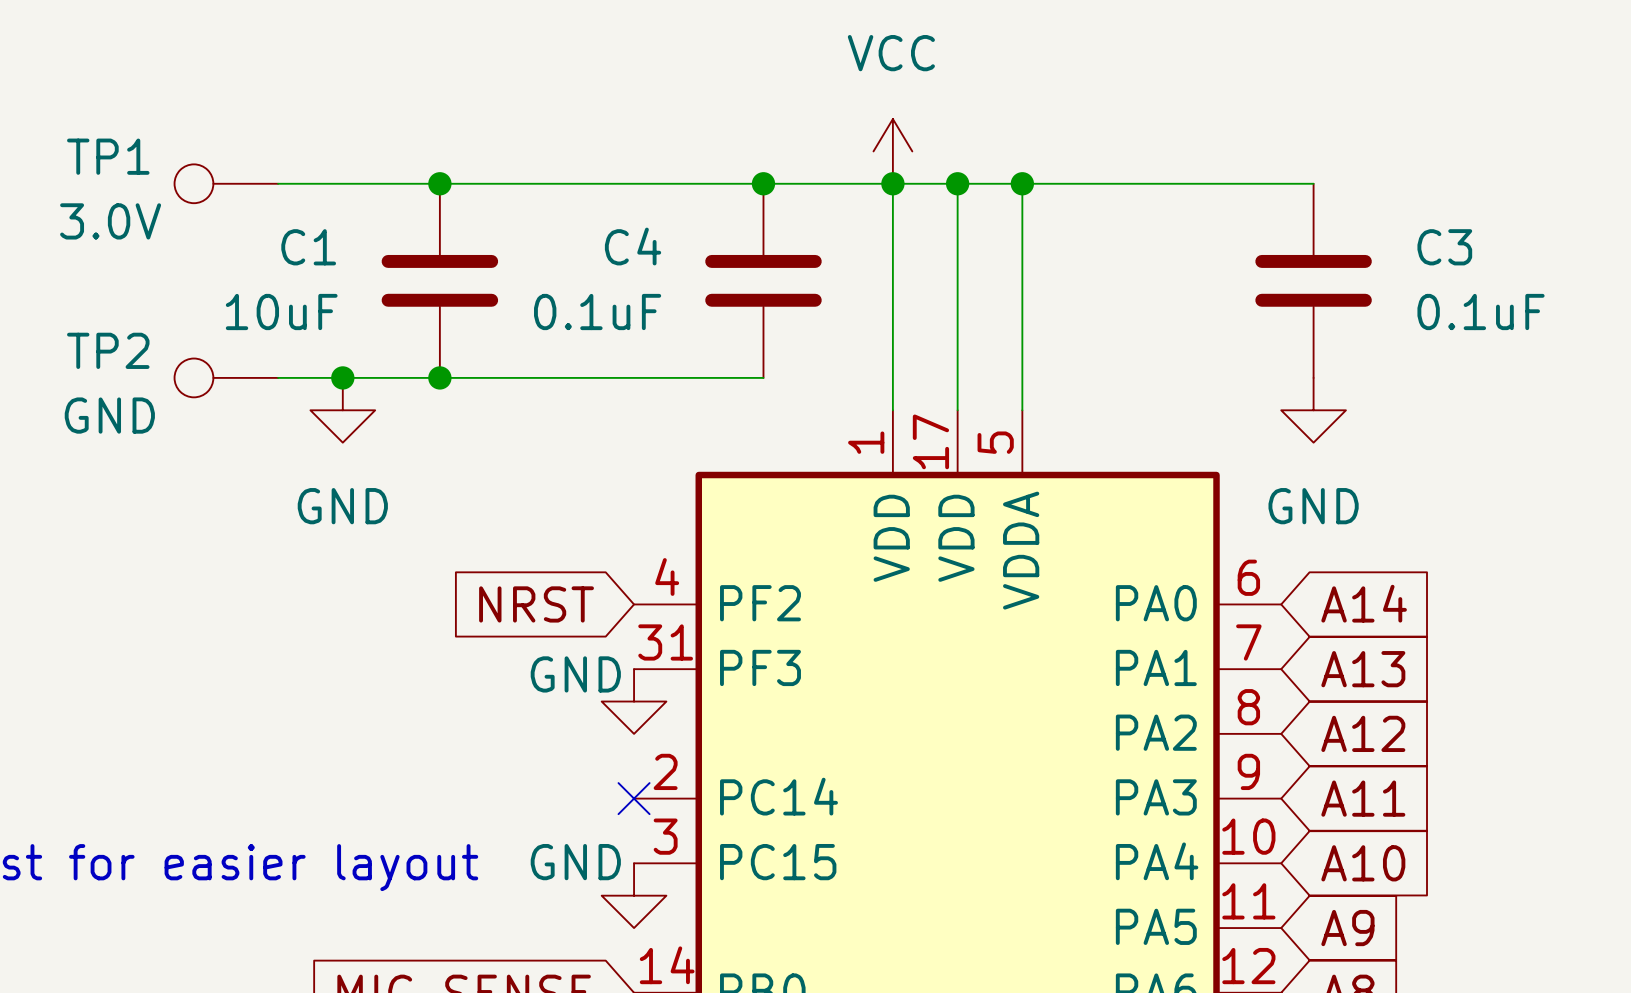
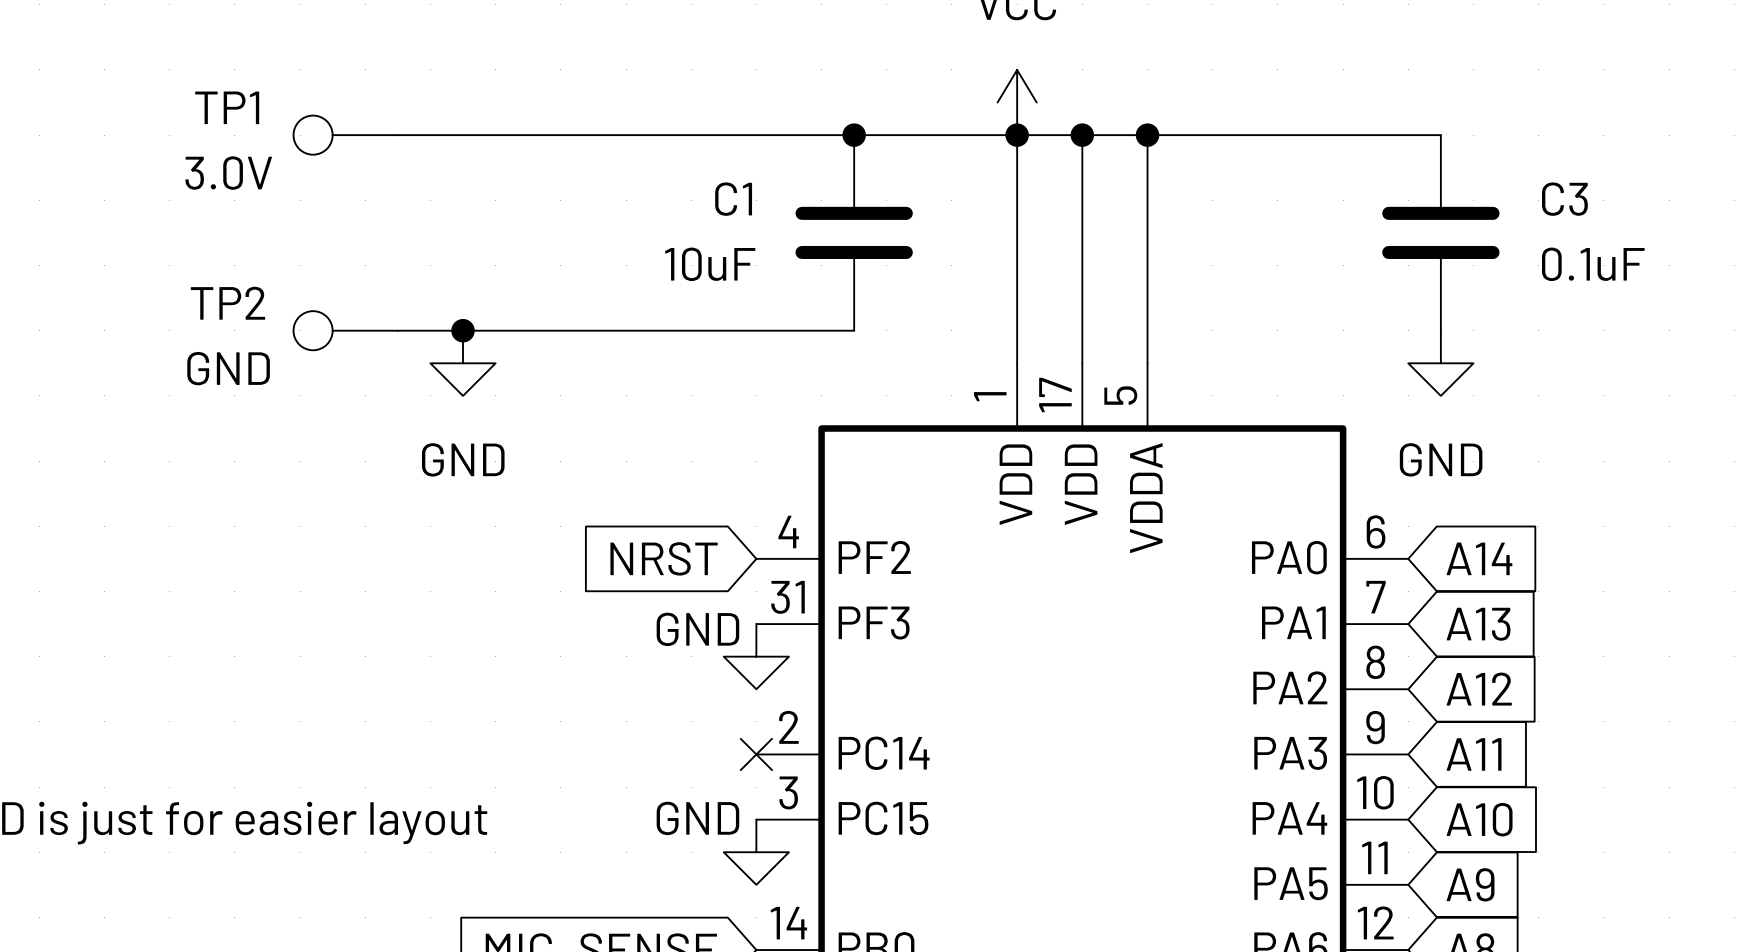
junction: (439, 183) -> none
junction position: (763, 183) -> (854, 135)
C1 position: (439, 280) -> (854, 232)
C4: 0.1uF (763, 280) -> none
junction: (439, 377) -> none
wire: (731, 377) (763, 377) -> none

